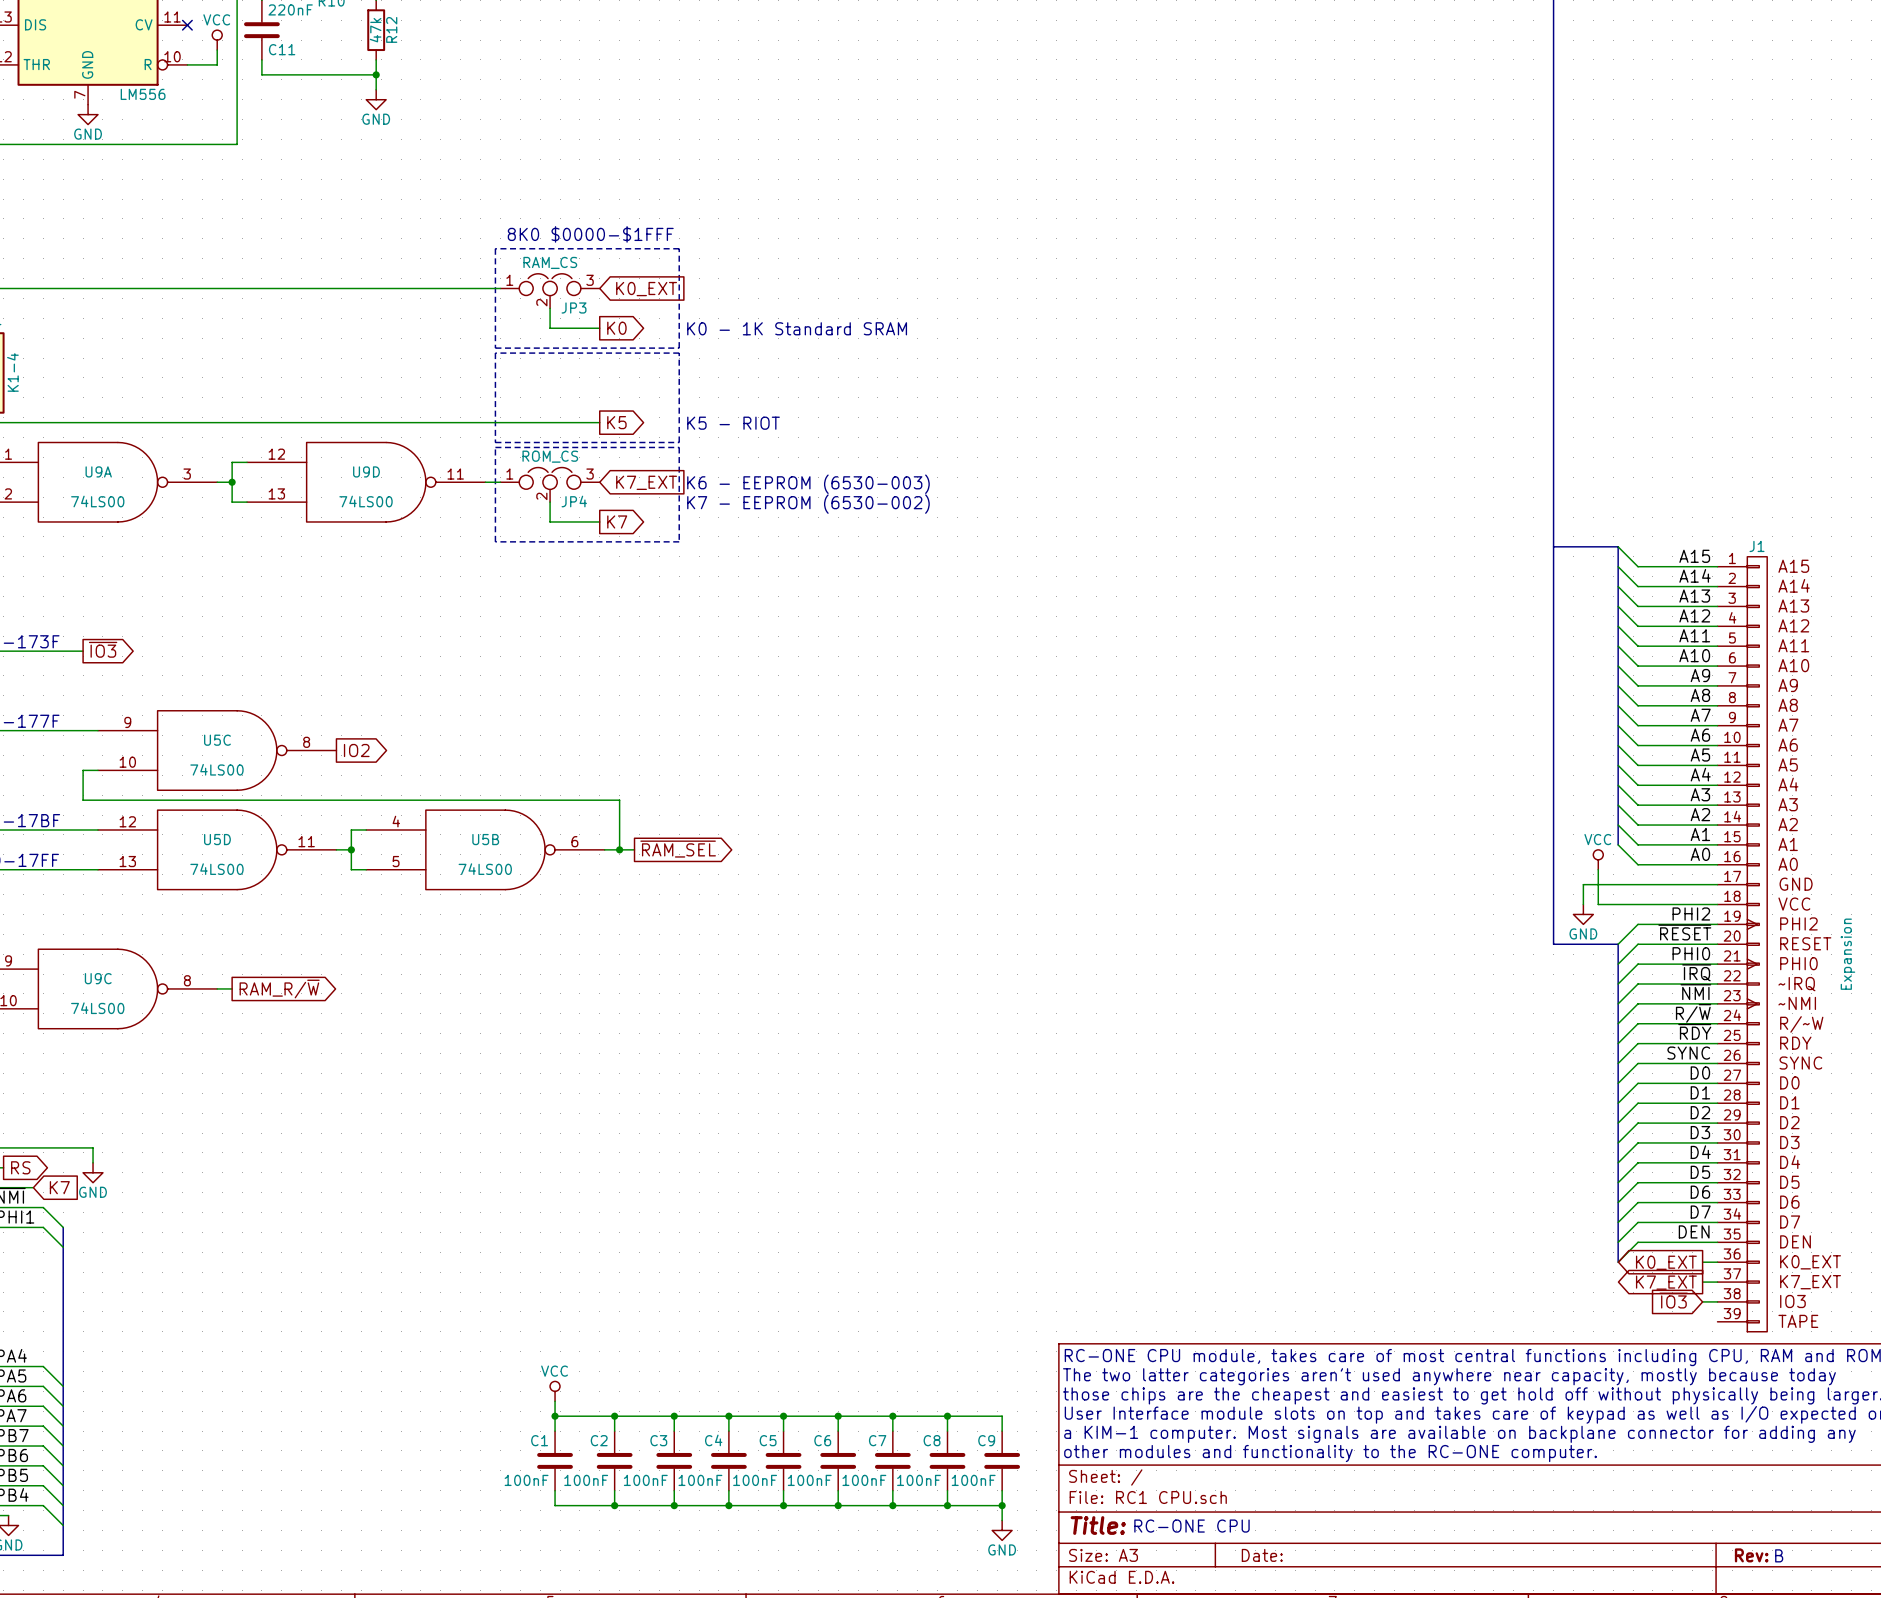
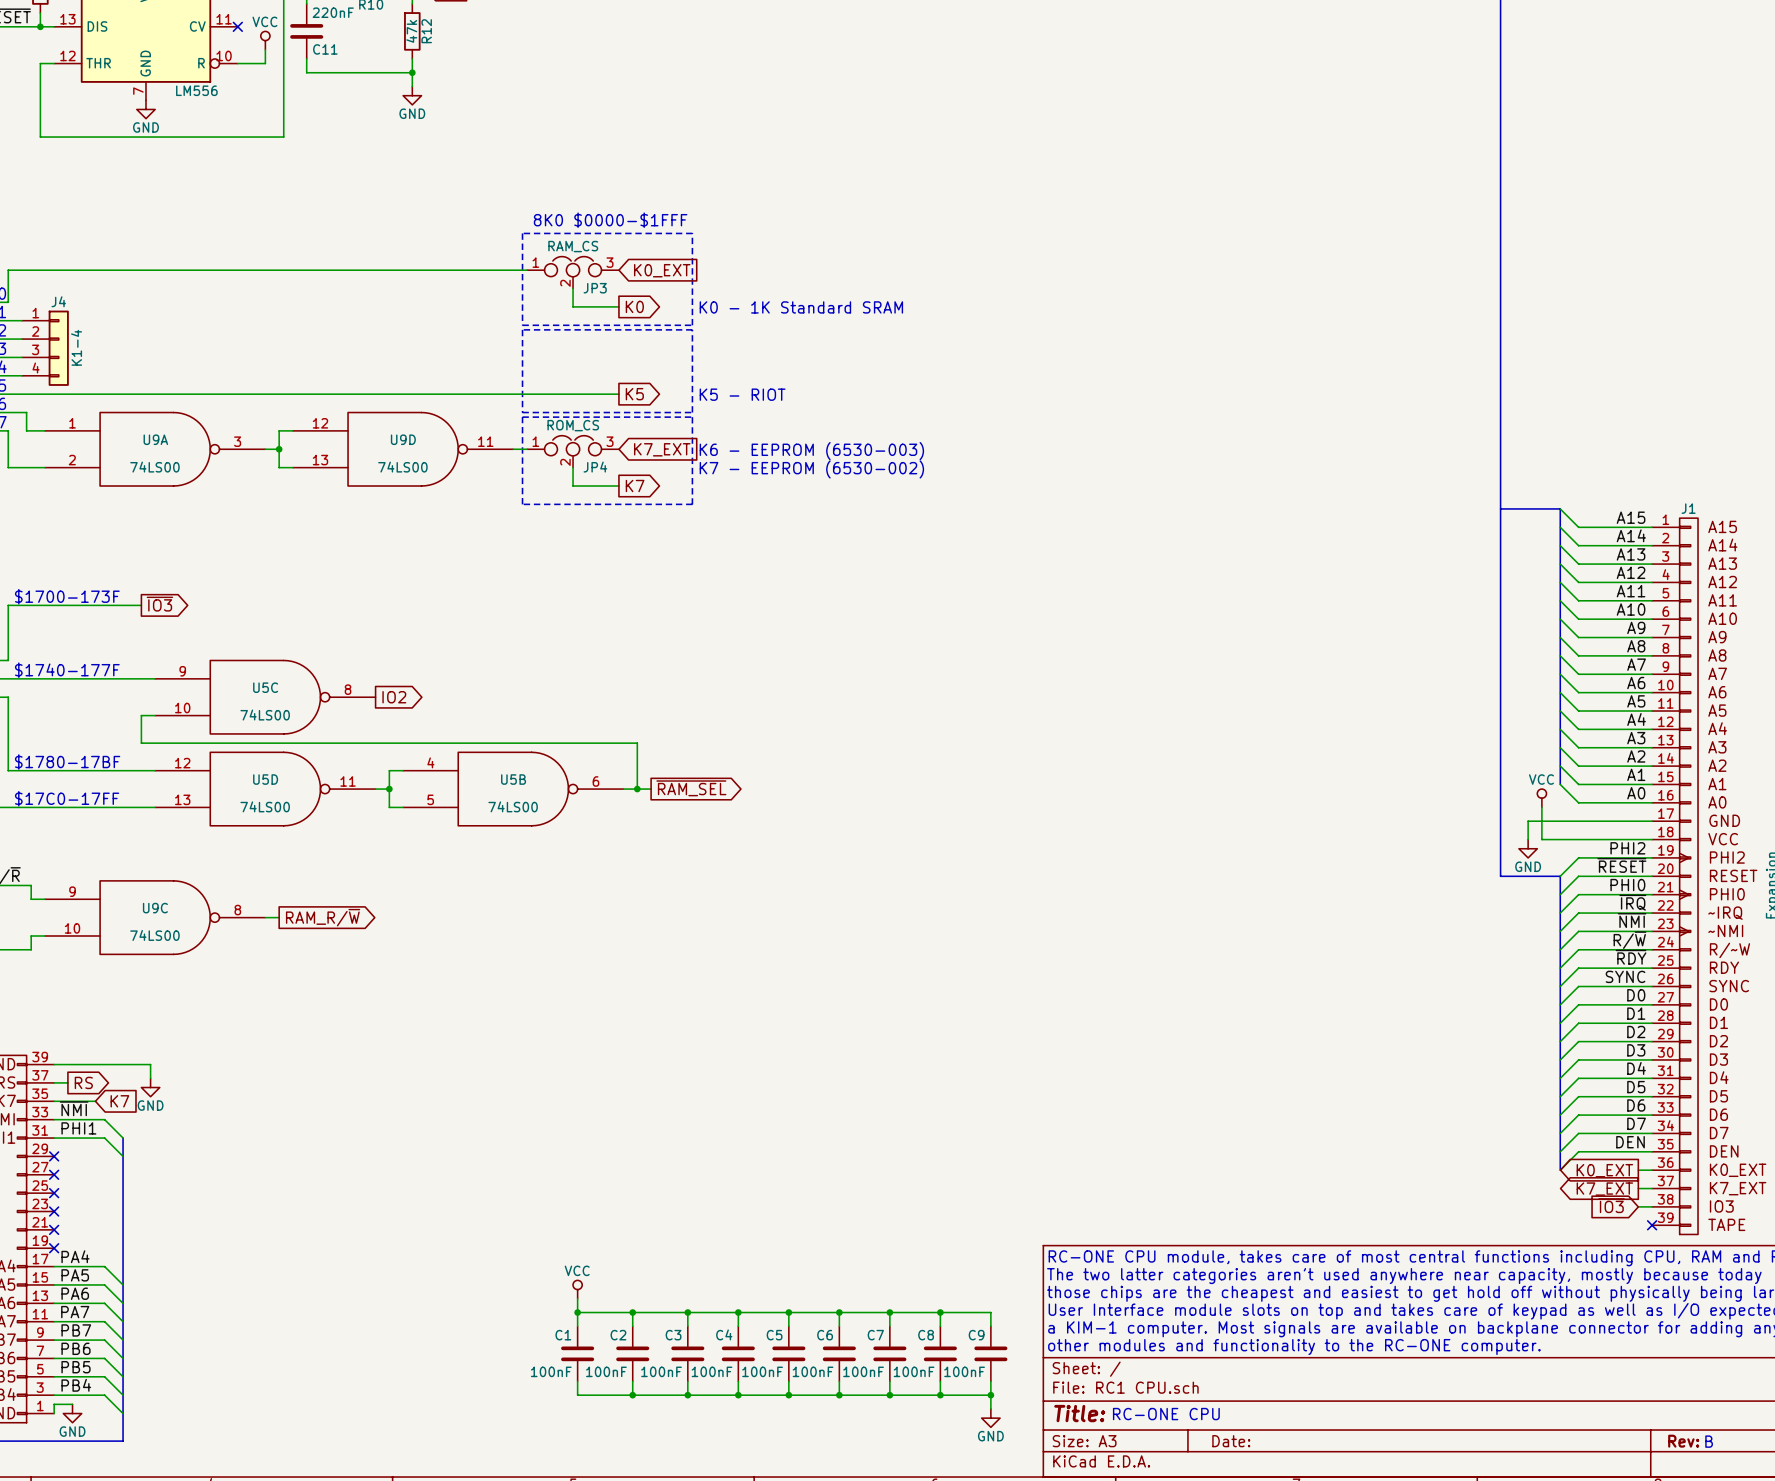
no-connect mark: none -> (1652, 1225)

